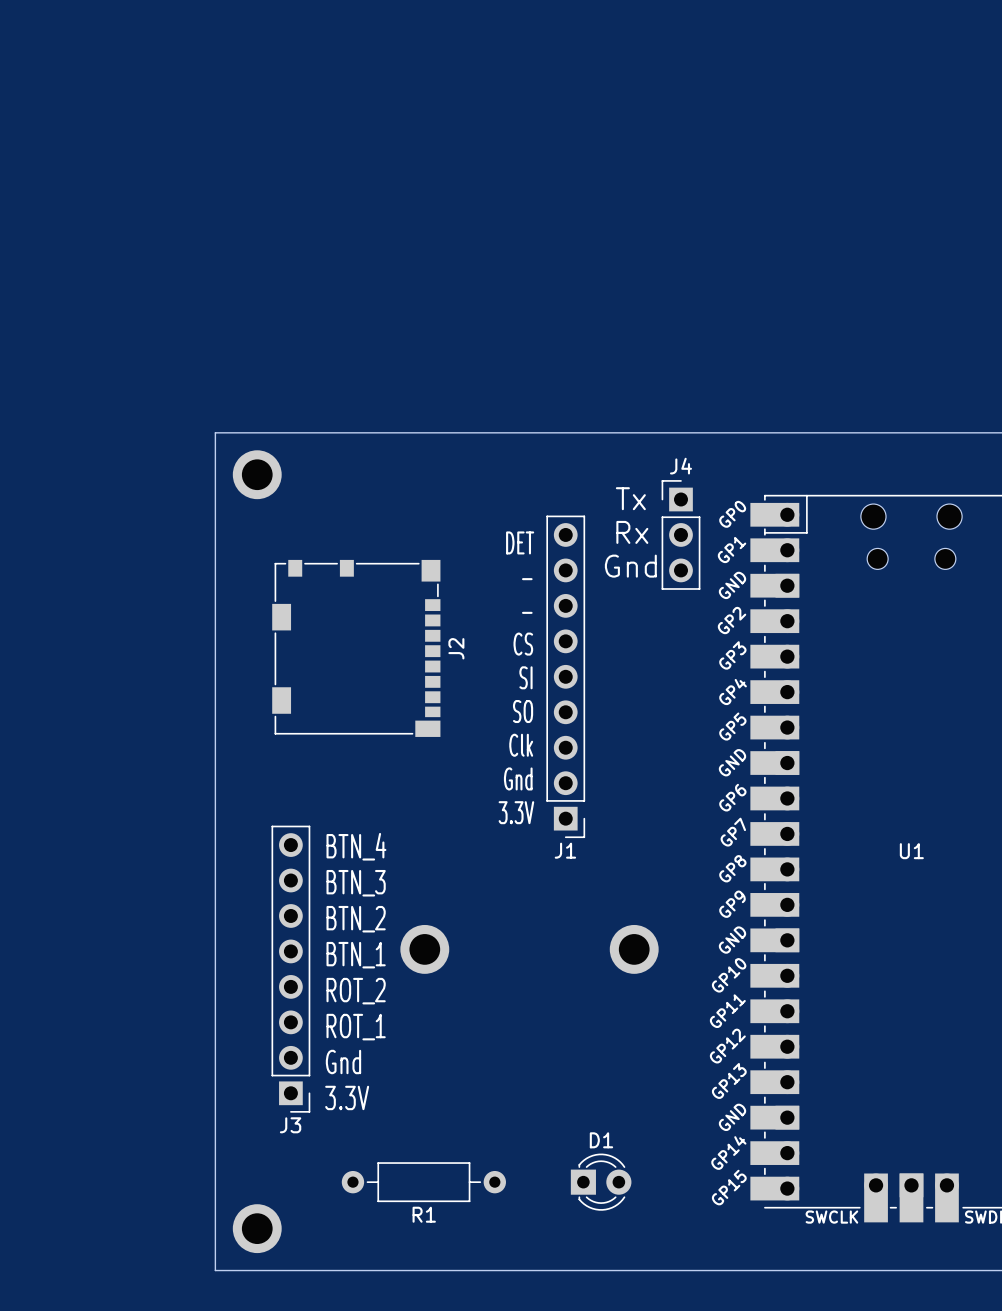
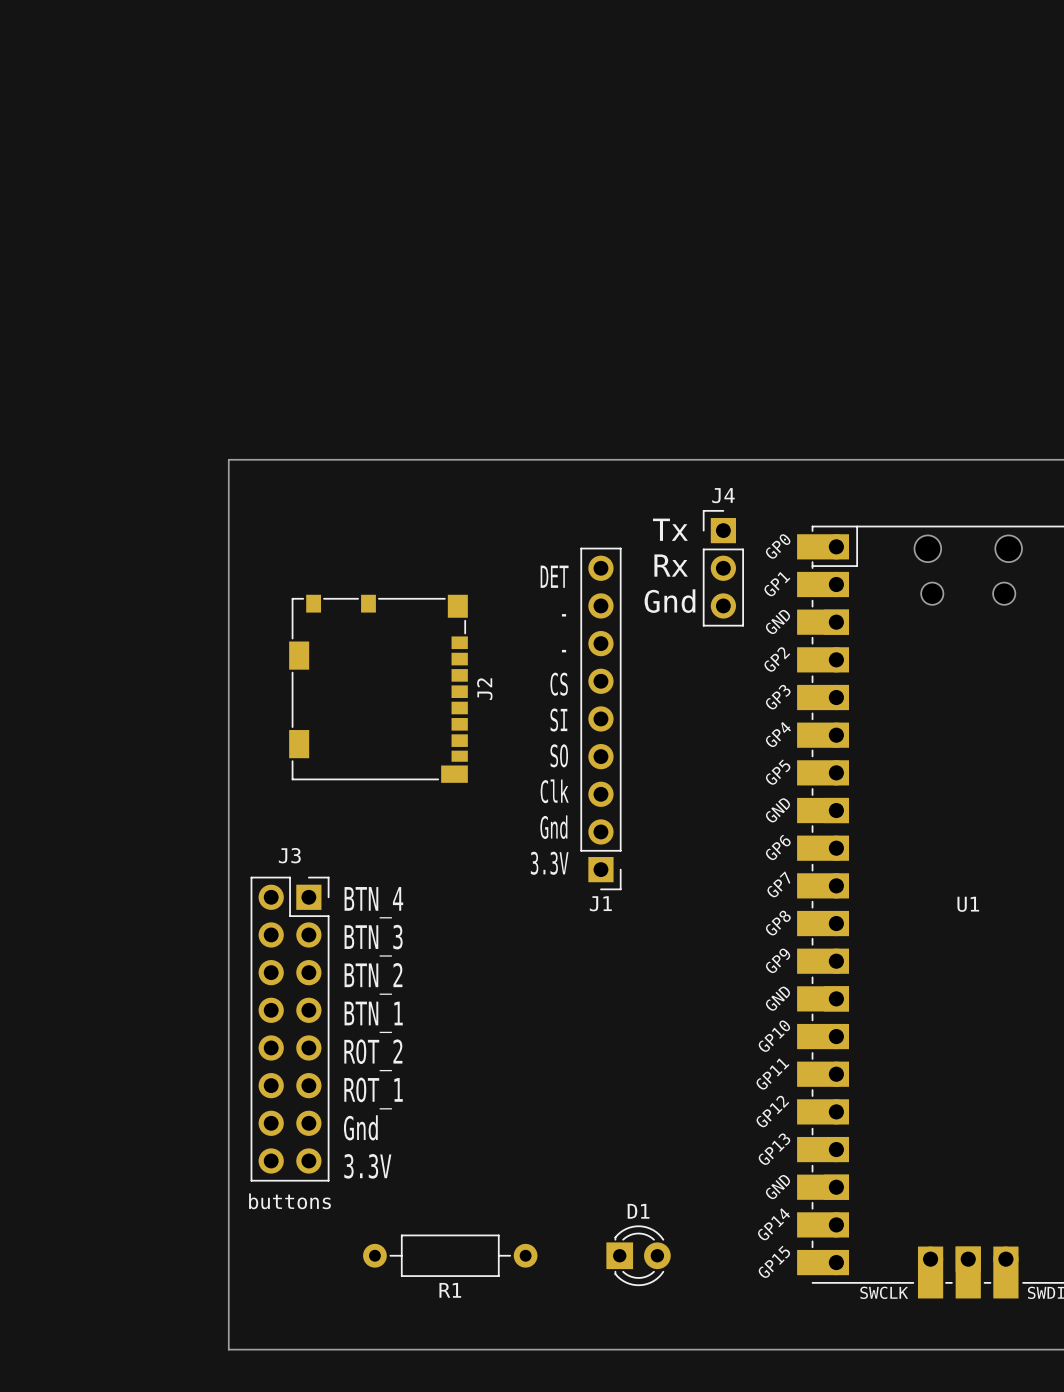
part: (257, 474) -> none
J3 footprint: [271, 825, 311, 1113] -> [250, 876, 330, 1182]
part: (424, 949) -> none
part: (634, 949) -> none
J3 name position: J3 (290, 1125) -> J3 (289, 855)
J3 value: none -> buttons (289, 1201)
part: (257, 1228) -> none

